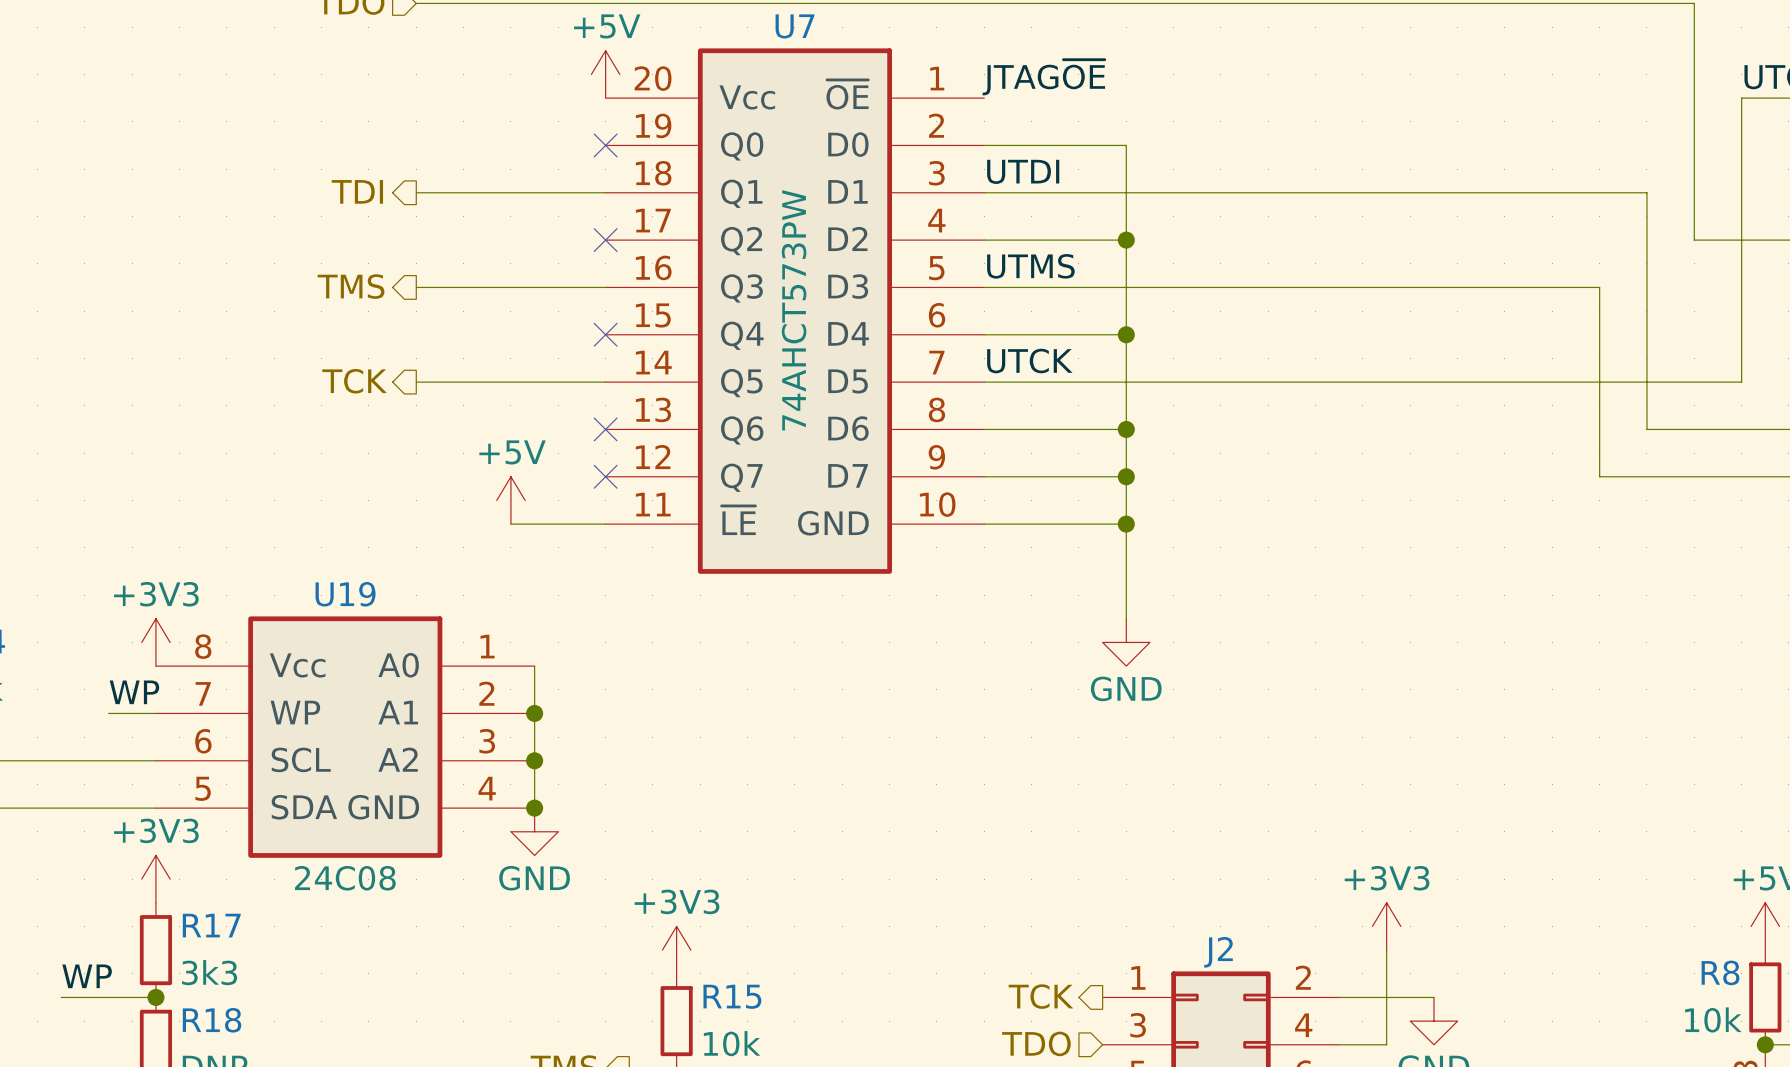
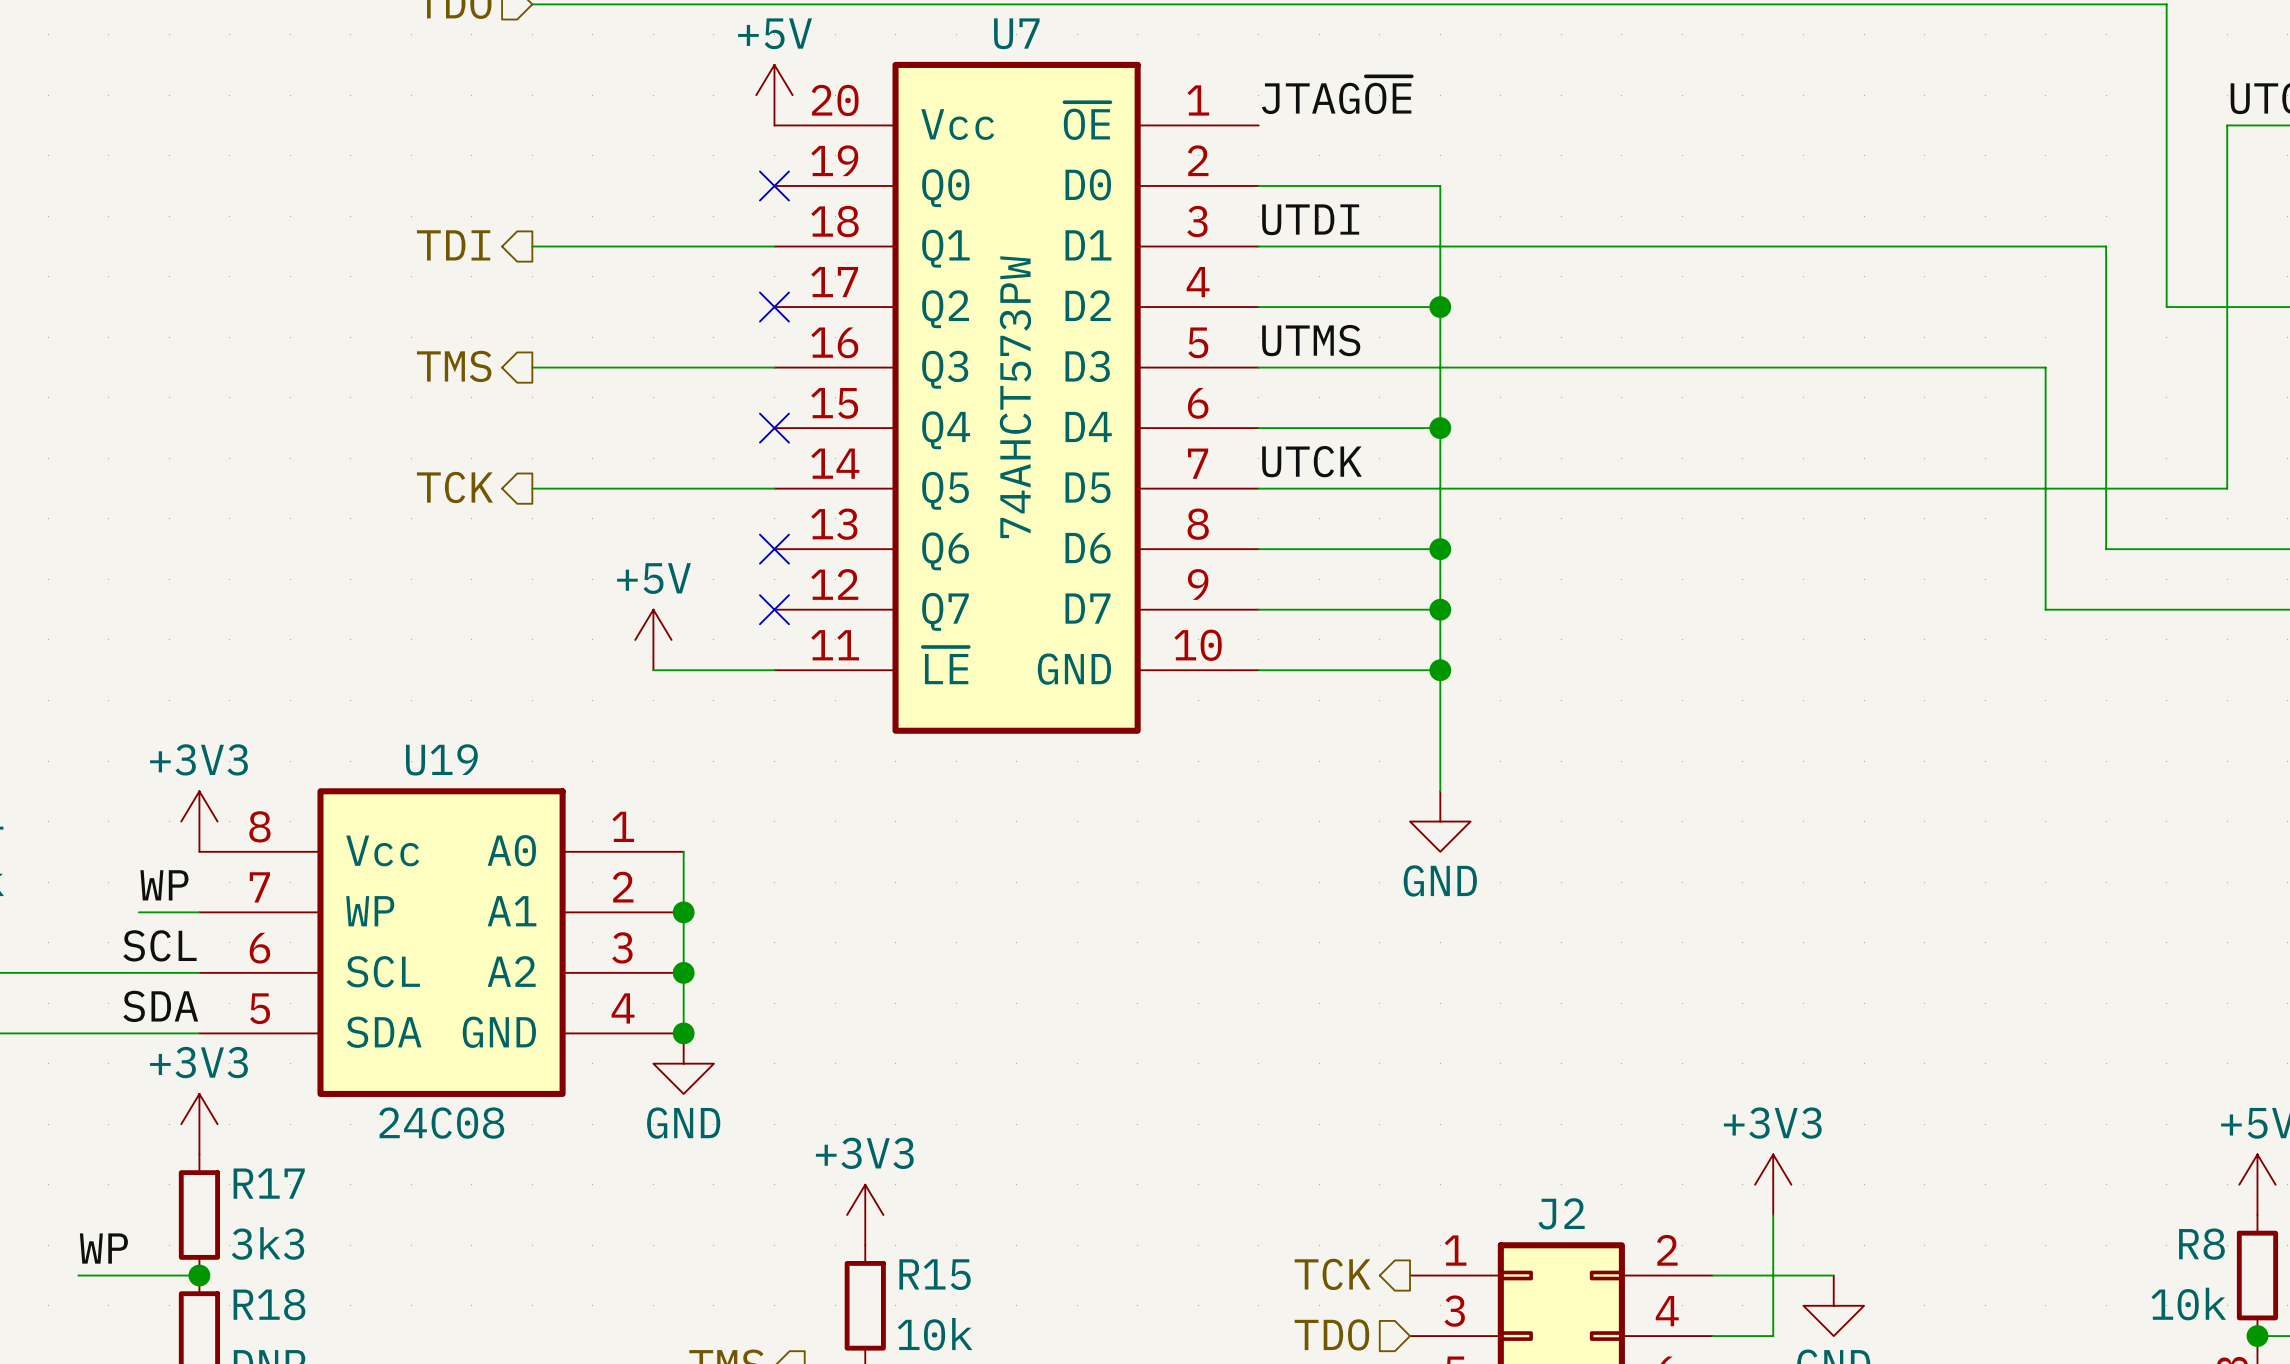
label: none -> SCL (159, 945)
label: none -> SDA (160, 1006)

